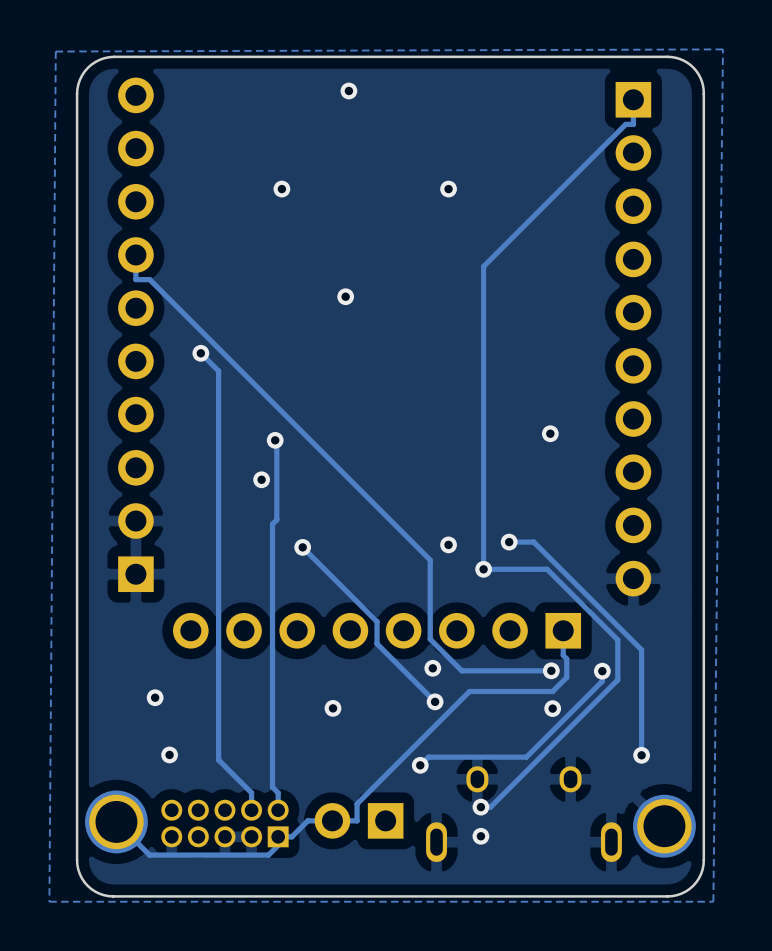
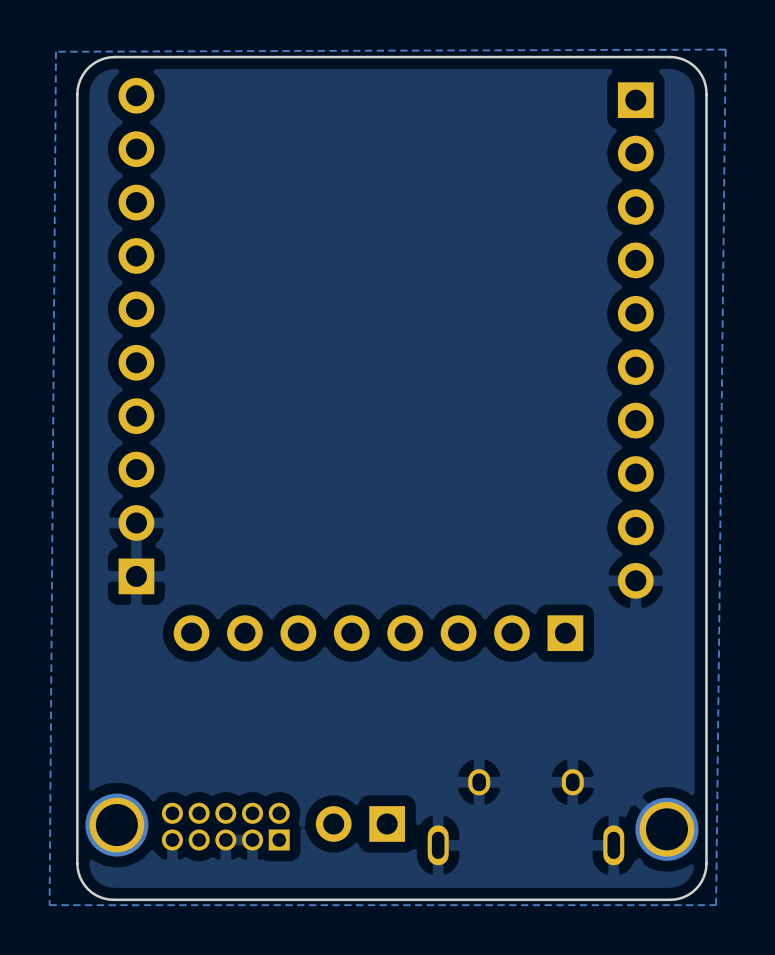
via: (348, 90) -> none
track: (633, 99) (633, 124) (625, 124) (483, 266) (483, 569) (547, 569) (617, 639) (617, 679) (490, 807) (480, 807) -> none
via: (281, 189) -> none
via: (448, 189) -> none
track: (135, 255) (135, 279) (149, 279) (430, 560) (430, 639) (461, 670) (551, 670) -> none
via: (345, 296) -> none
track: (200, 353) (218, 371) (218, 759) (251, 792) (251, 810) -> none
via: (200, 353) -> none
via: (550, 433) -> none
track: (275, 440) (276, 441) (276, 519) (272, 524) (272, 787) (278, 792) (278, 810) -> none
via: (275, 440) -> none
via: (261, 479) -> none
track: (509, 542) (533, 542) (641, 649) (641, 755) -> none
via: (509, 542) -> none
via: (448, 544) -> none
track: (302, 547) (377, 621) (377, 643) (435, 701) -> none
via: (302, 547) -> none
via: (483, 569) -> none
track: (563, 630) (563, 655) (566, 658) (566, 677) (552, 691) (469, 691) (357, 803) (357, 820) (307, 820) (291, 836) (278, 836) -> none
via: (432, 668) -> none
via: (551, 670) -> none
track: (602, 671) (602, 681) (526, 757) (428, 757) (420, 765) -> none
via: (602, 671) -> none
via: (155, 697) -> none
via: (435, 701) -> none
via: (333, 708) -> none
via: (552, 708) -> none
via: (169, 754) -> none
via: (641, 755) -> none
via: (420, 765) -> none
via: (480, 807) -> none
track: (116, 821) (149, 855) (268, 855) (286, 836) -> none
via: (480, 836) -> none

